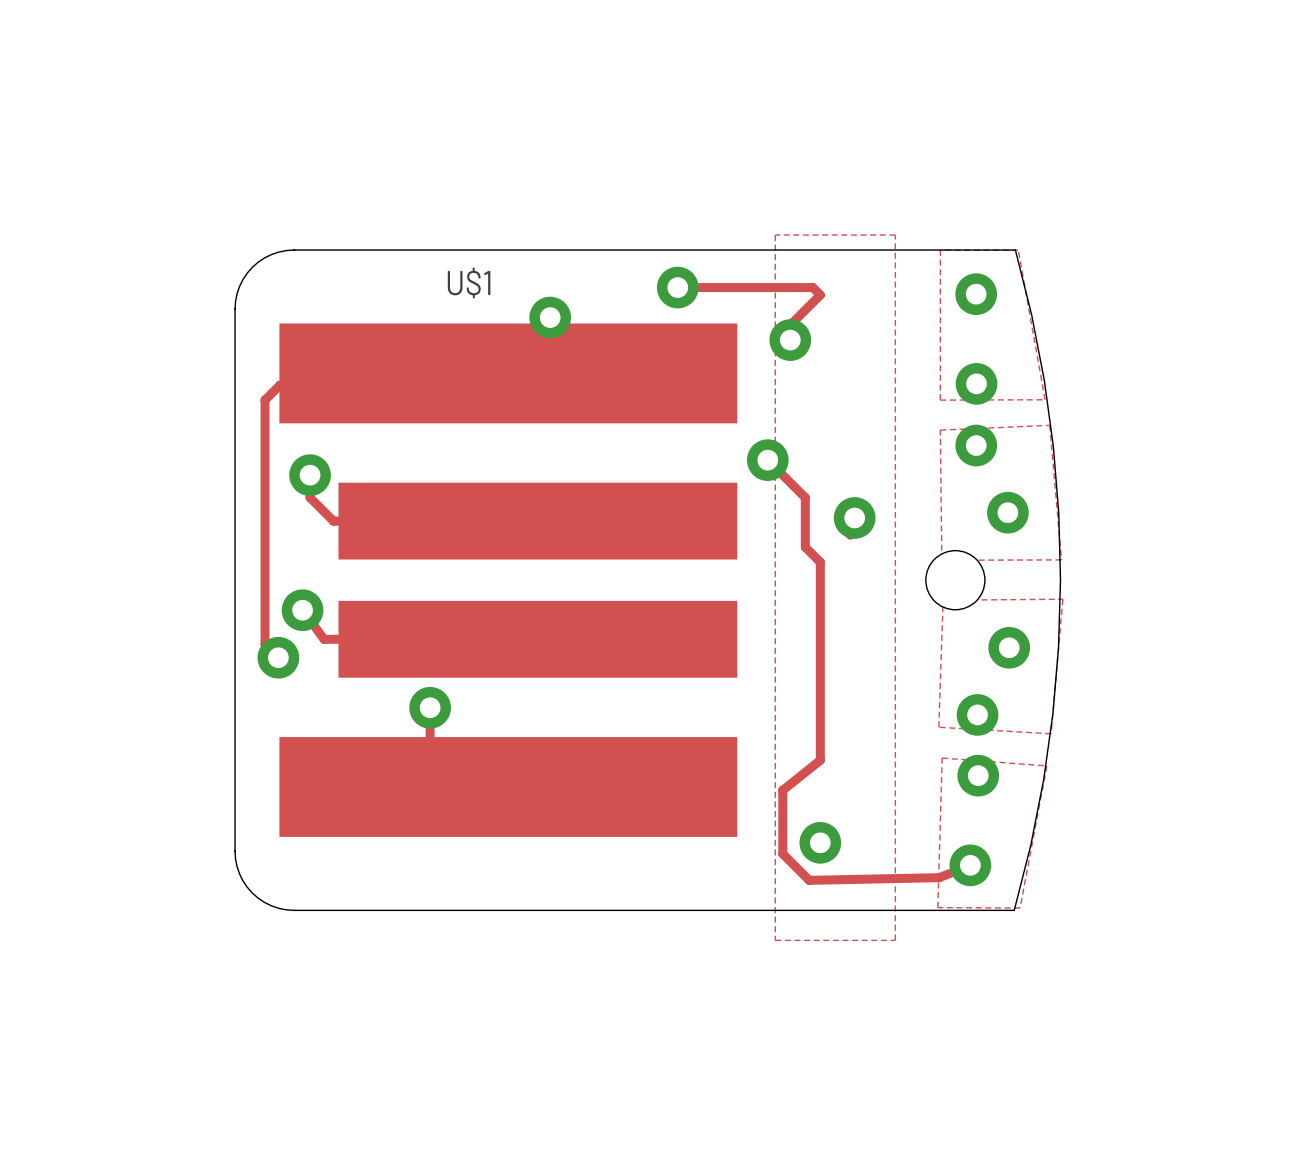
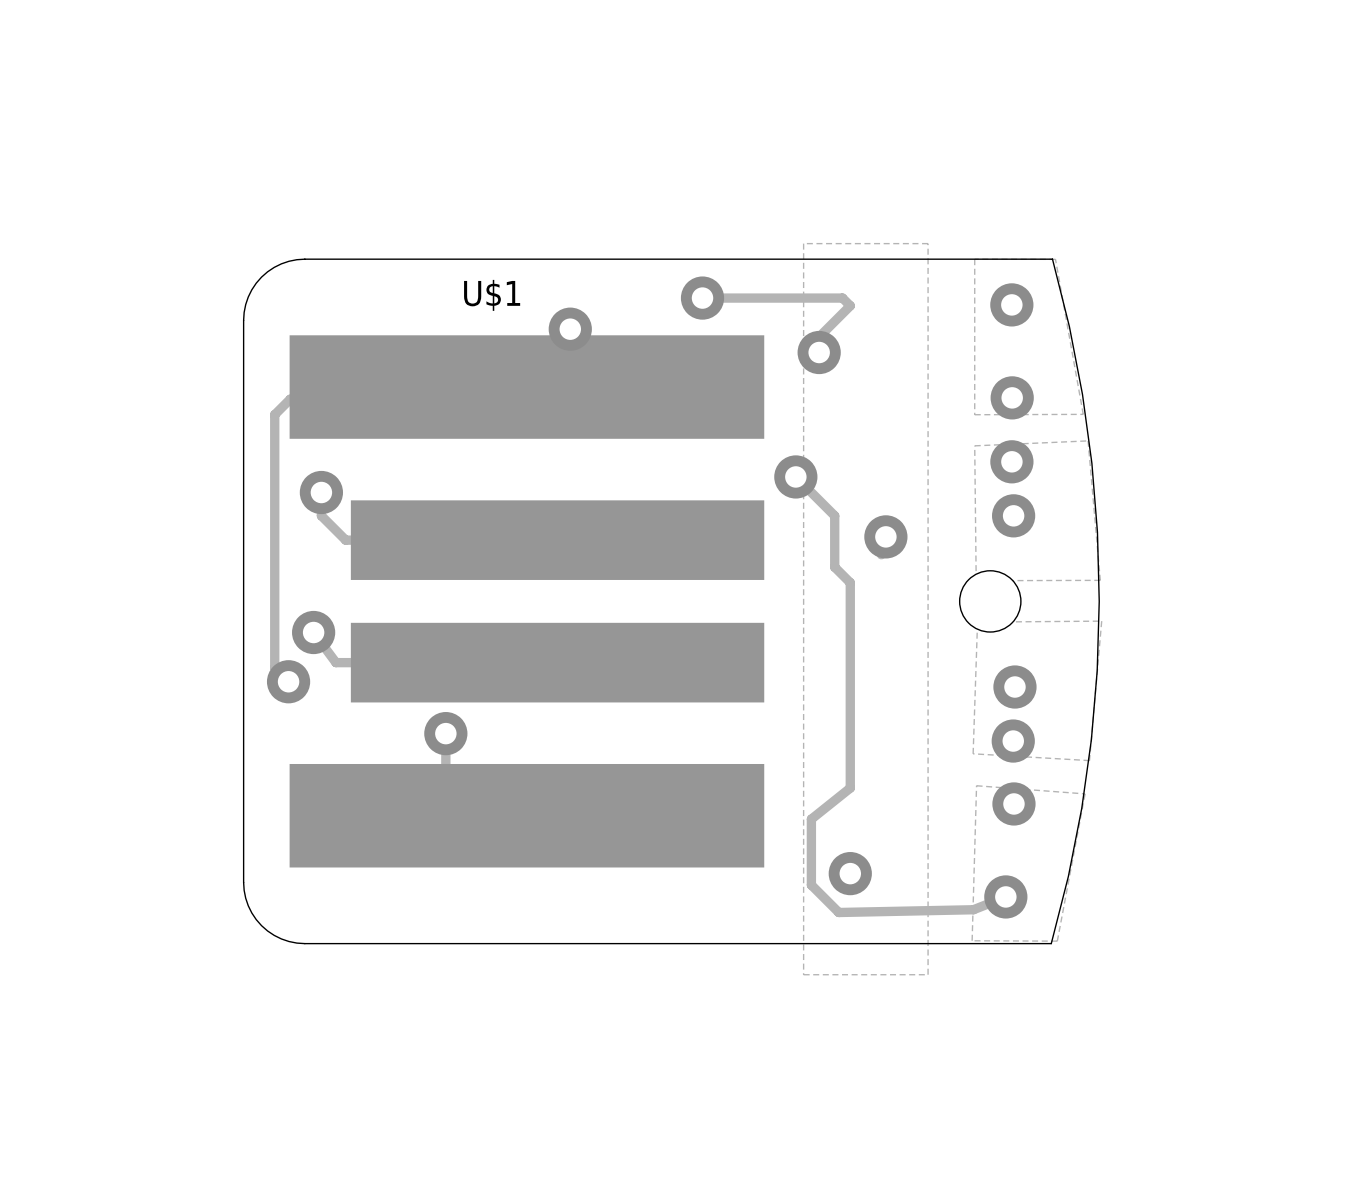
via position: (1007, 512) -> (1013, 515)
via position: (1009, 647) -> (1014, 687)

